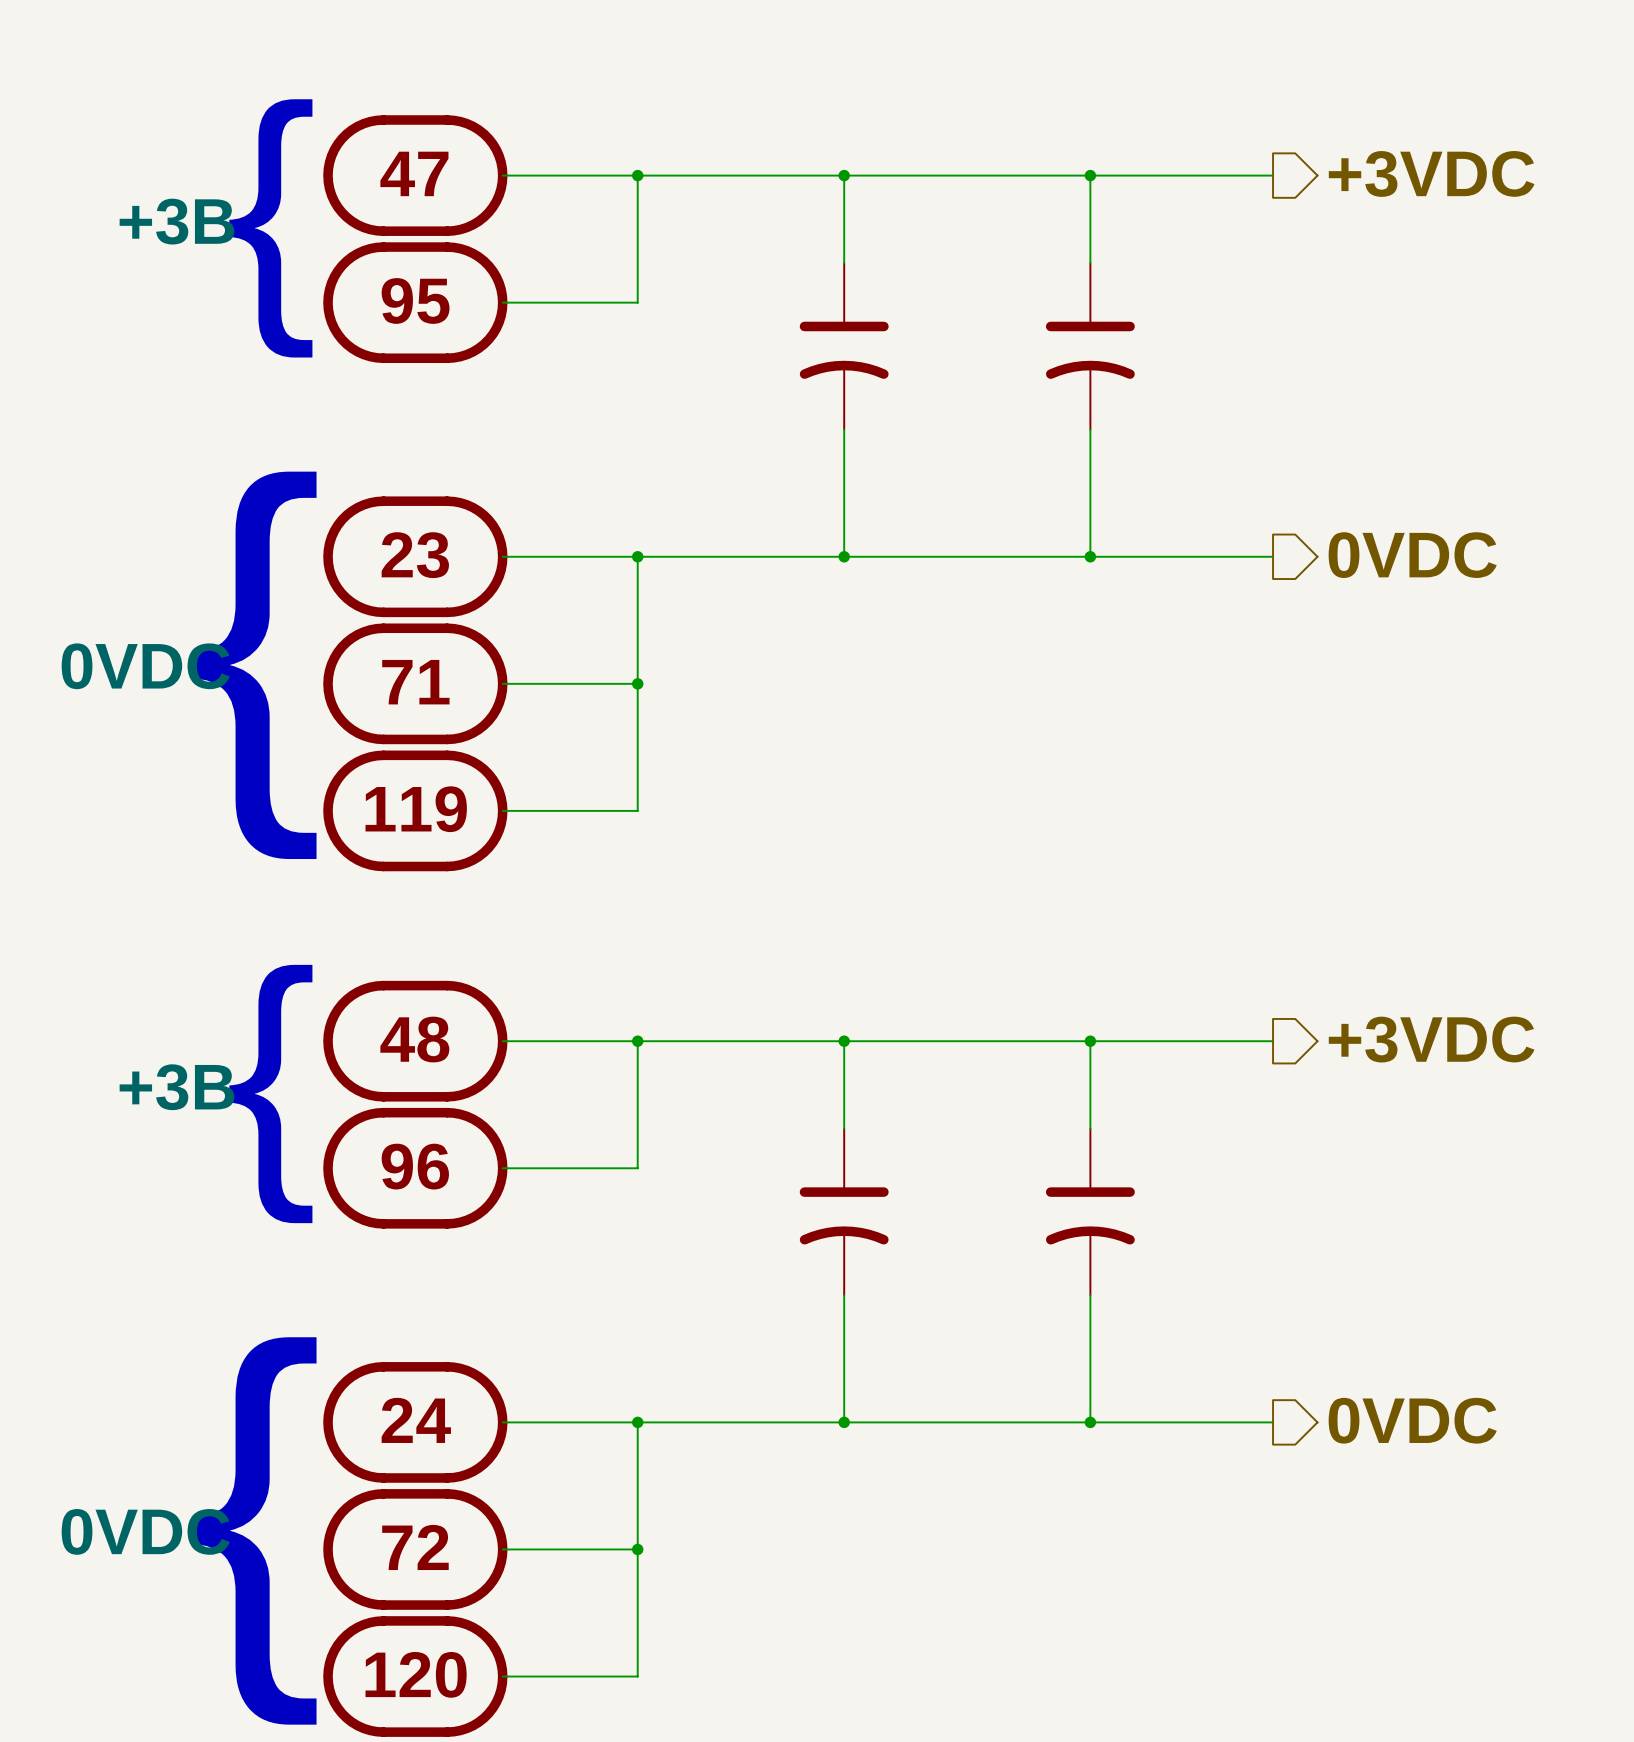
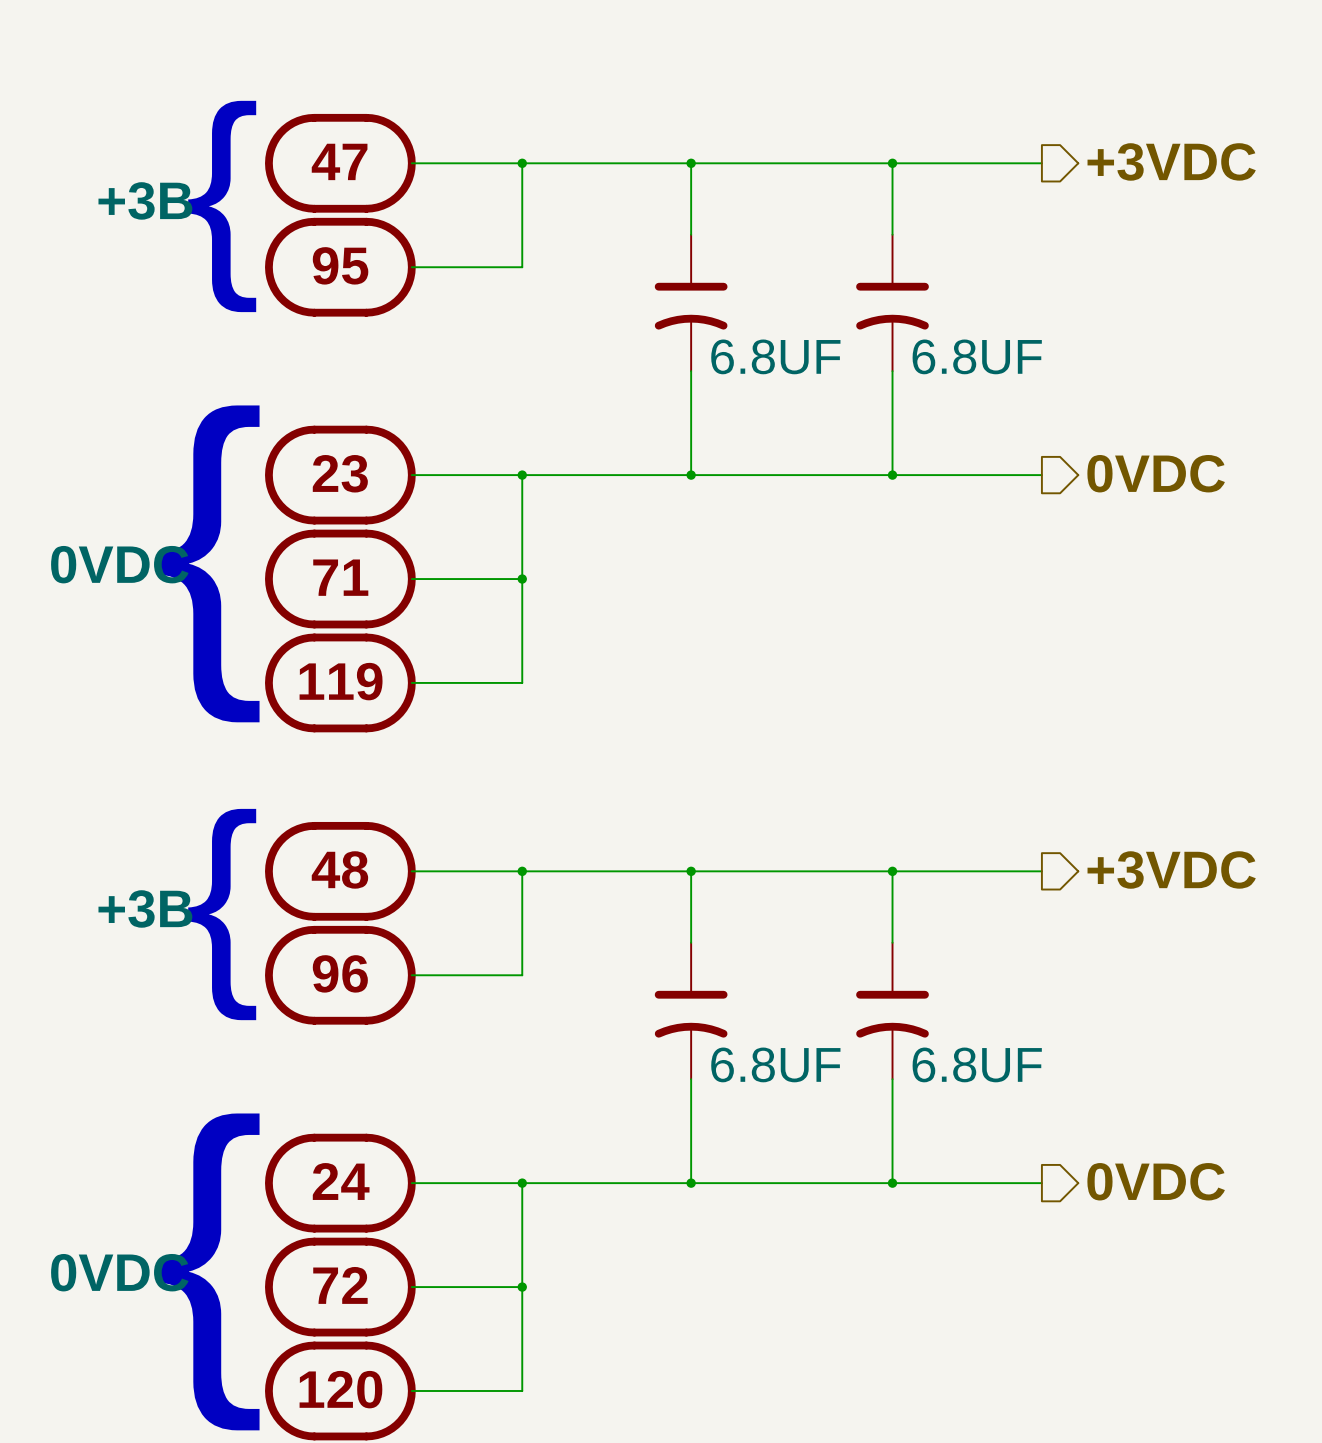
part value: none -> 6.8UF (775, 356)
part value: none -> 6.8UF (977, 356)
part value: none -> 6.8UF (775, 1064)
part value: none -> 6.8UF (977, 1064)

